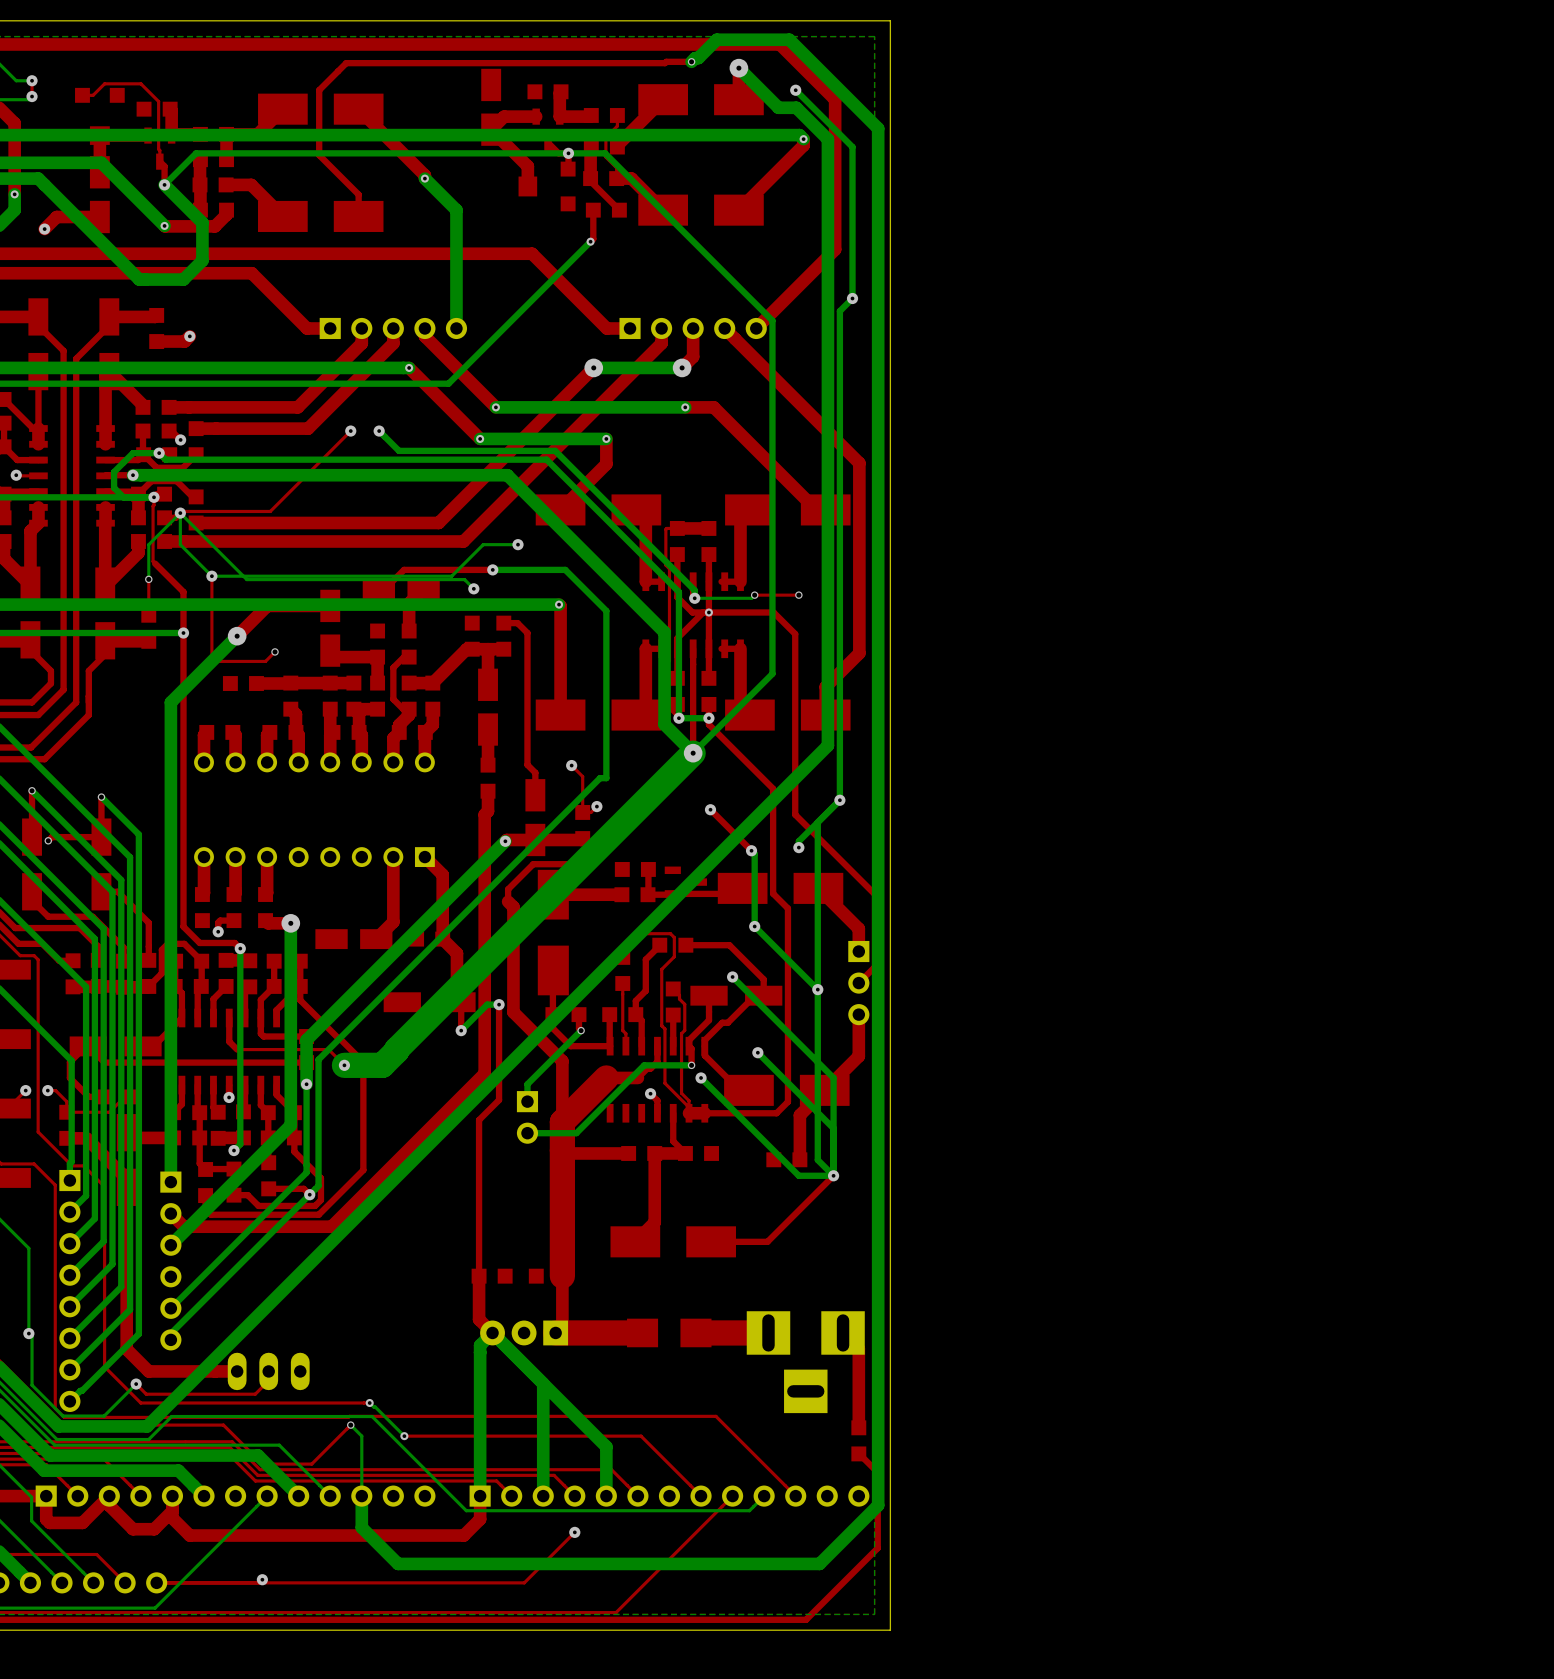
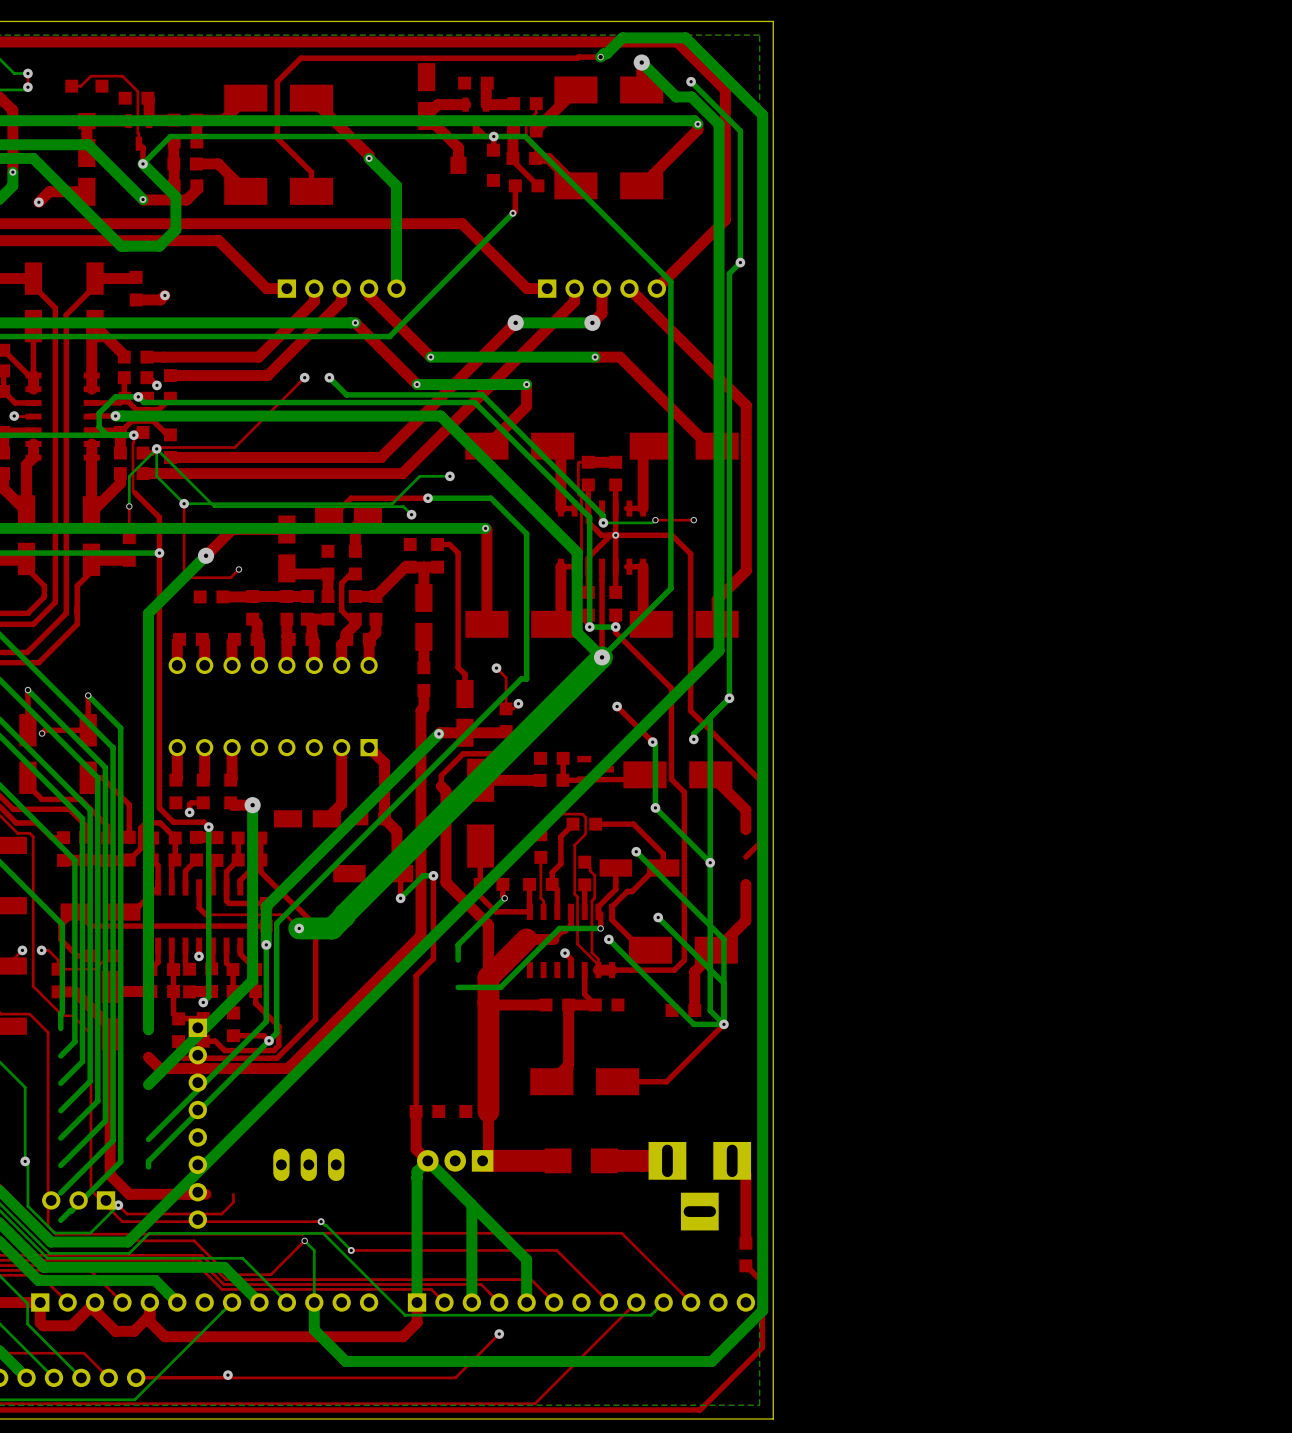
part: (858, 983) -> none
part: (527, 1117) -> none
part: (170, 1260) -> none
part position: (69, 1290) -> (197, 1123)
part position: (268, 1371) -> (308, 1164)
part: none -> (78, 1200)

